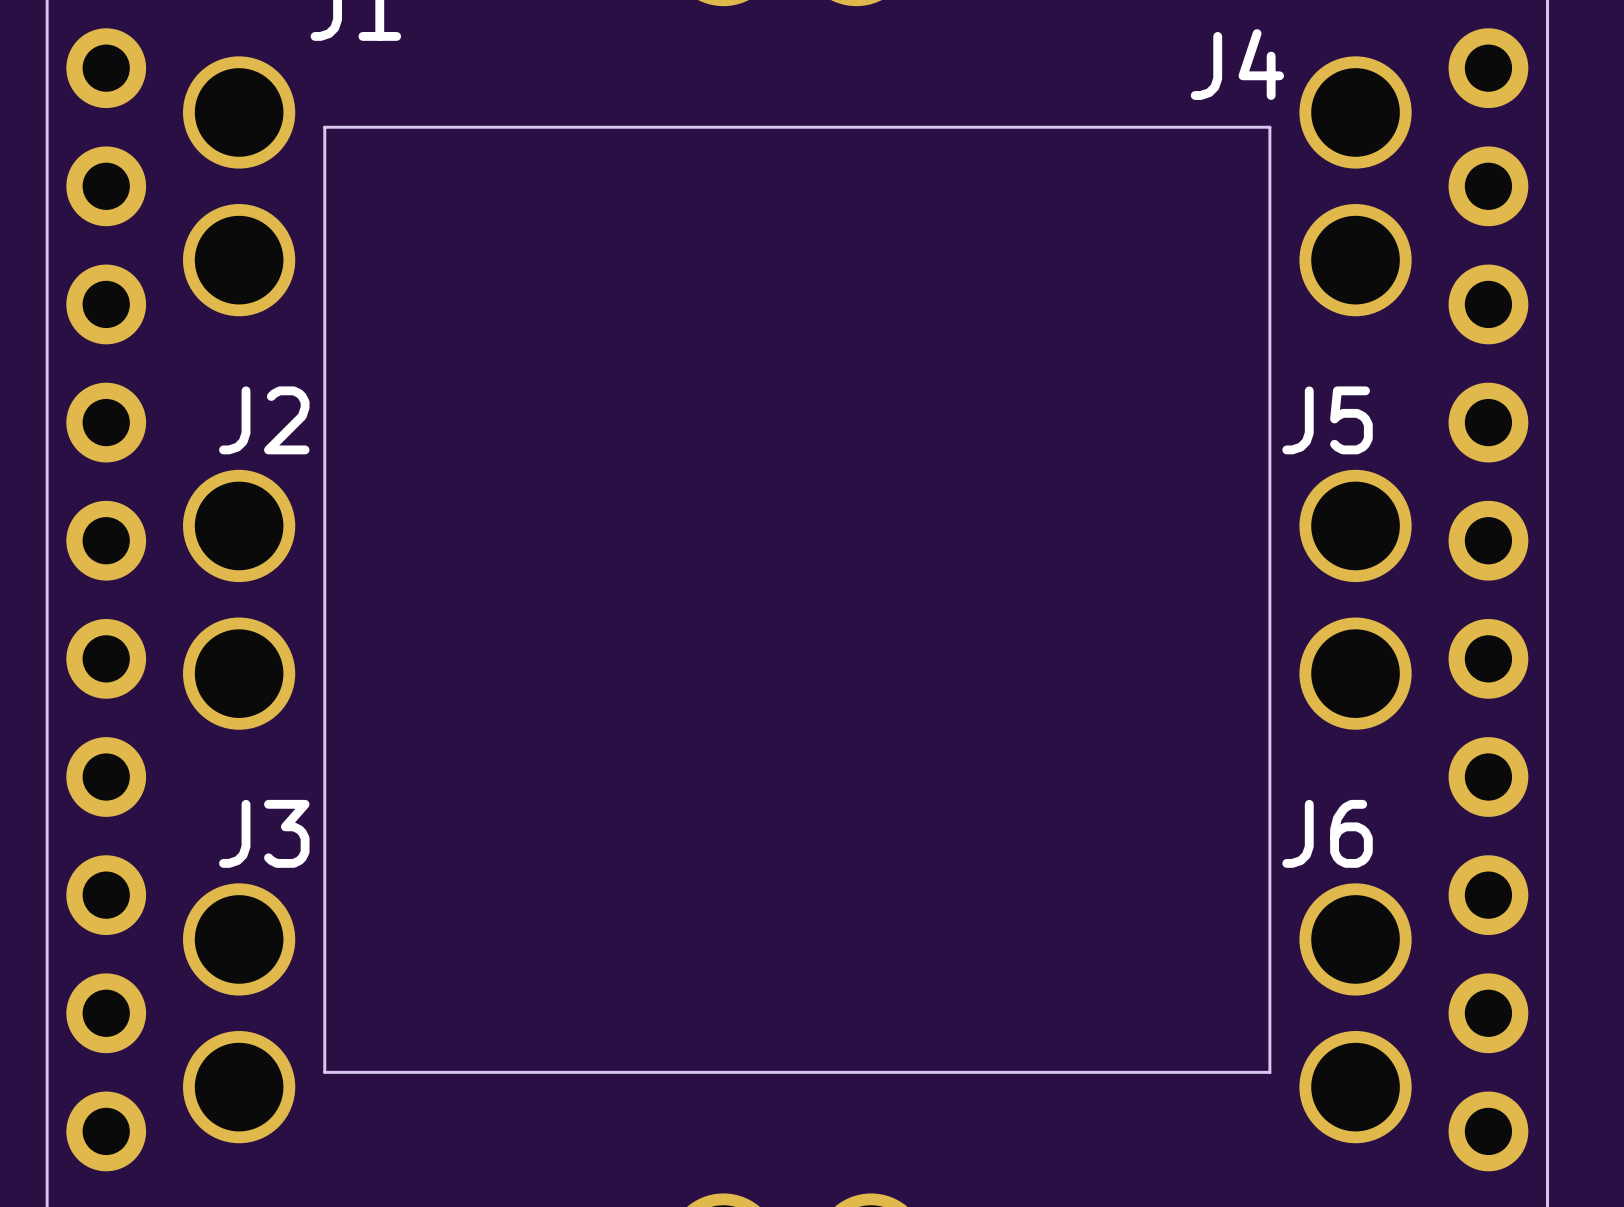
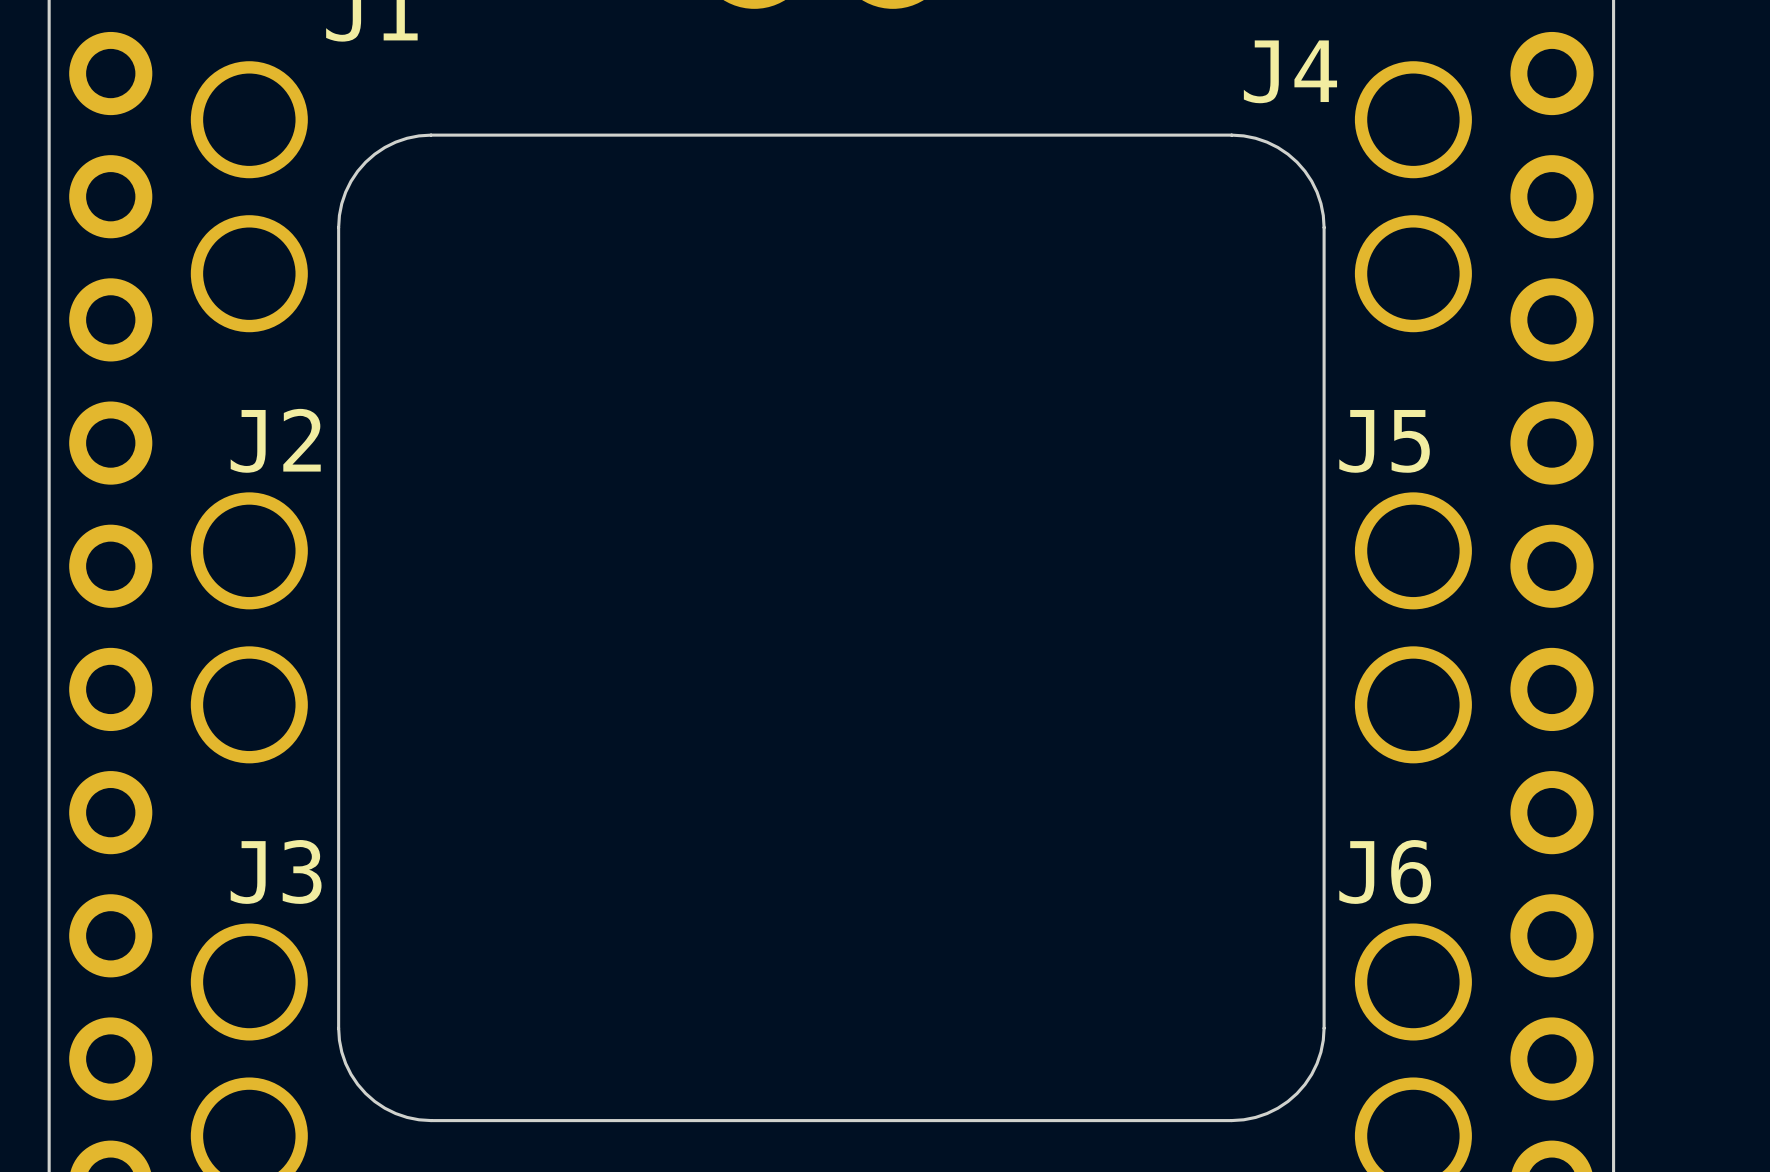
board edge: (413, 127) (324, 127) (324, 215) -> (431, 135) (407, 138) (395, 142) (374, 154) (365, 162) (357, 171) (345, 192) (341, 203) (338, 227)
board edge: (1181, 127) (1269, 127) (1269, 215) -> (1231, 135) (1255, 138) (1267, 142) (1287, 154) (1297, 162) (1305, 171) (1317, 192) (1320, 203) (1324, 227)
board edge: (324, 983) (324, 1072) (413, 1072) -> (338, 1028) (341, 1052) (345, 1063) (357, 1084) (365, 1093) (374, 1101) (395, 1113) (407, 1117) (431, 1120)
board edge: (1269, 983) (1269, 1072) (1181, 1072) -> (1324, 1028) (1320, 1052) (1317, 1063) (1305, 1084) (1297, 1093) (1287, 1101) (1267, 1113) (1255, 1117) (1231, 1120)

